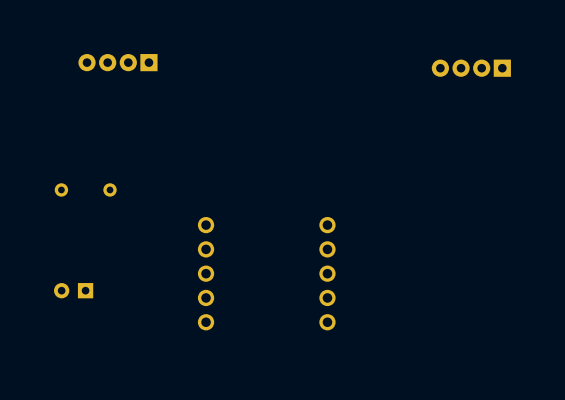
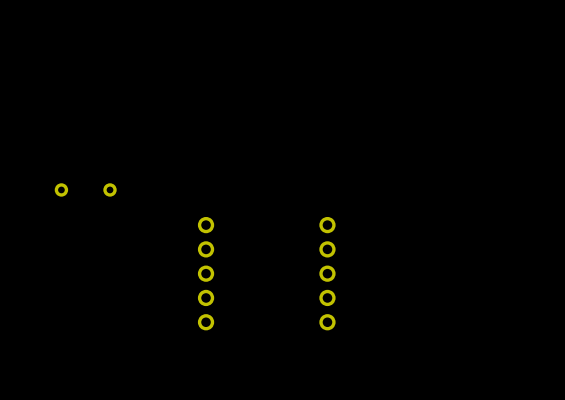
part: (117, 62) -> none
part: (471, 68) -> none
part: (73, 290) -> none

